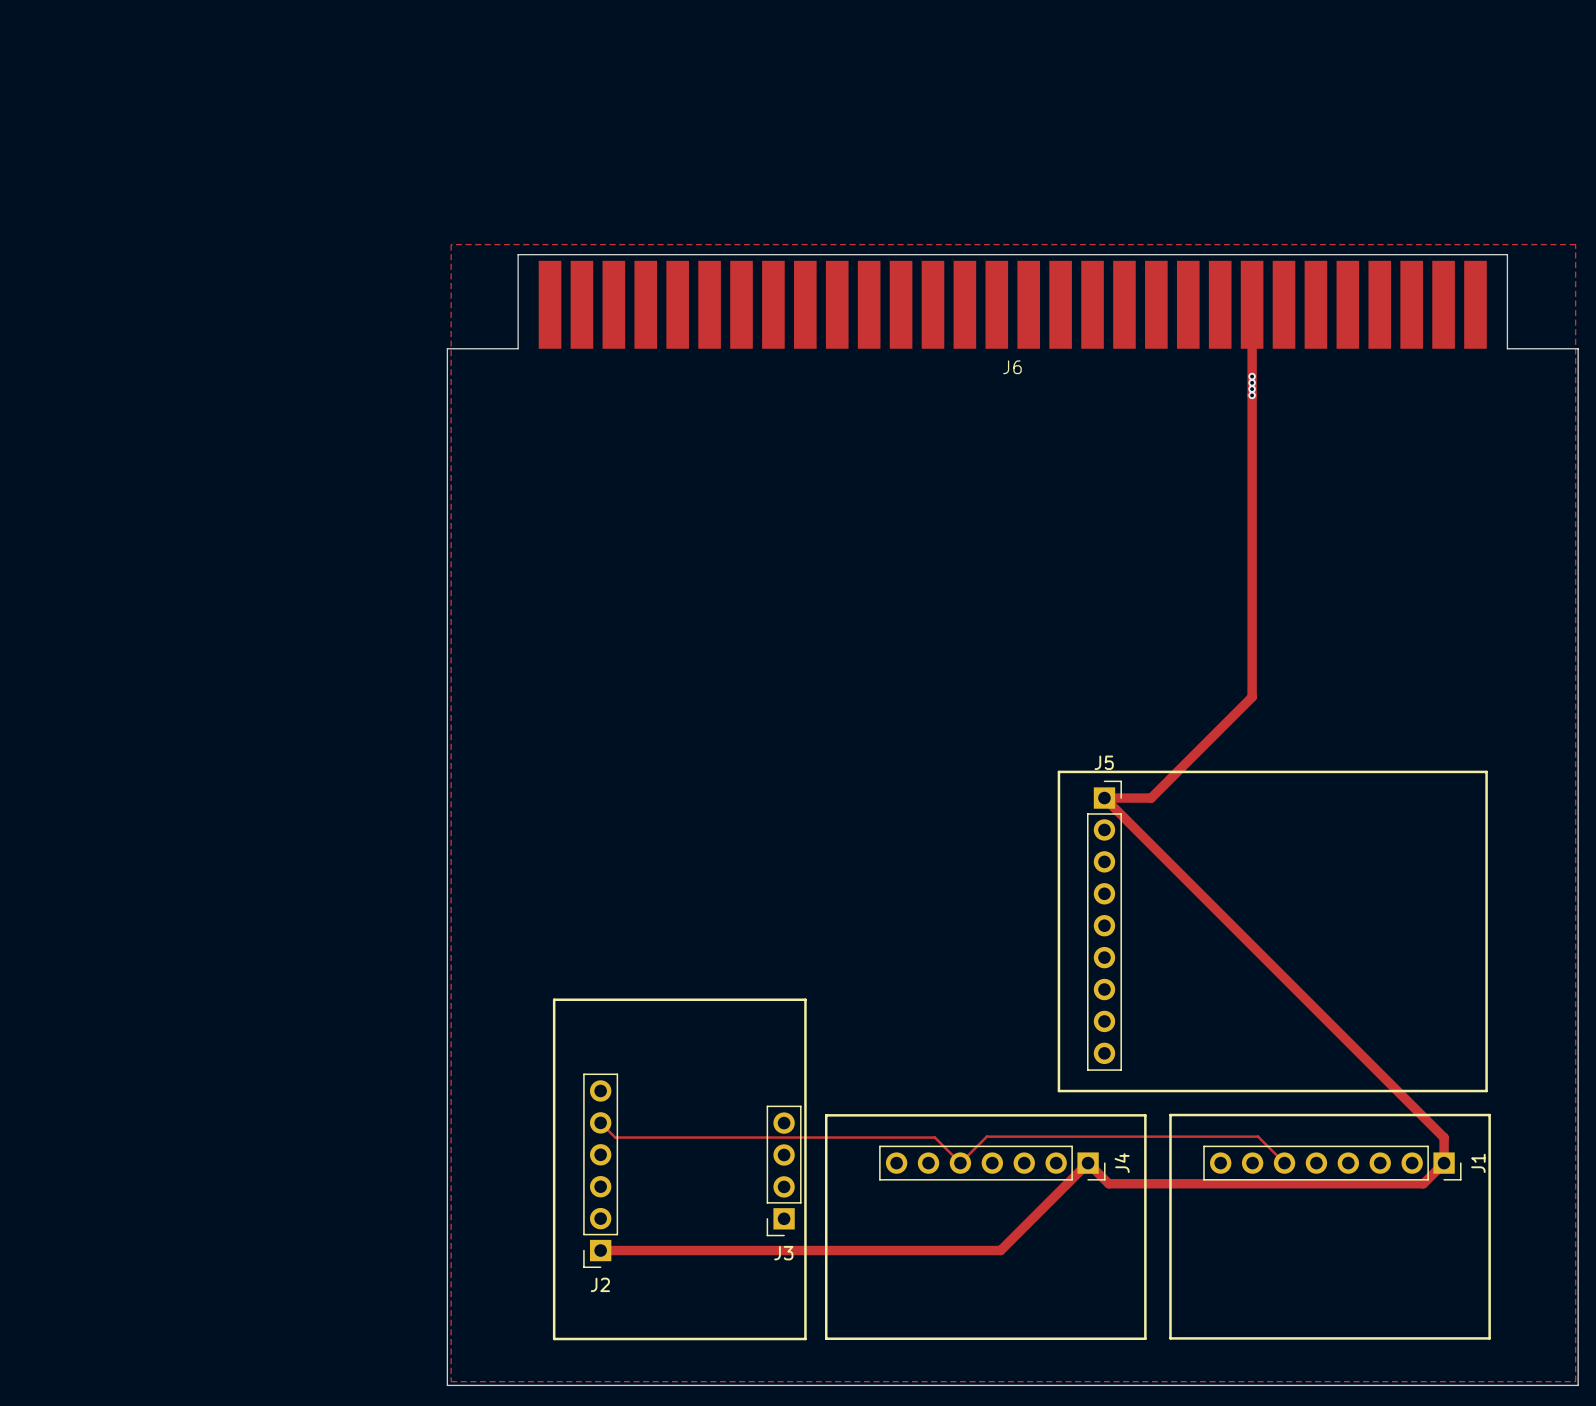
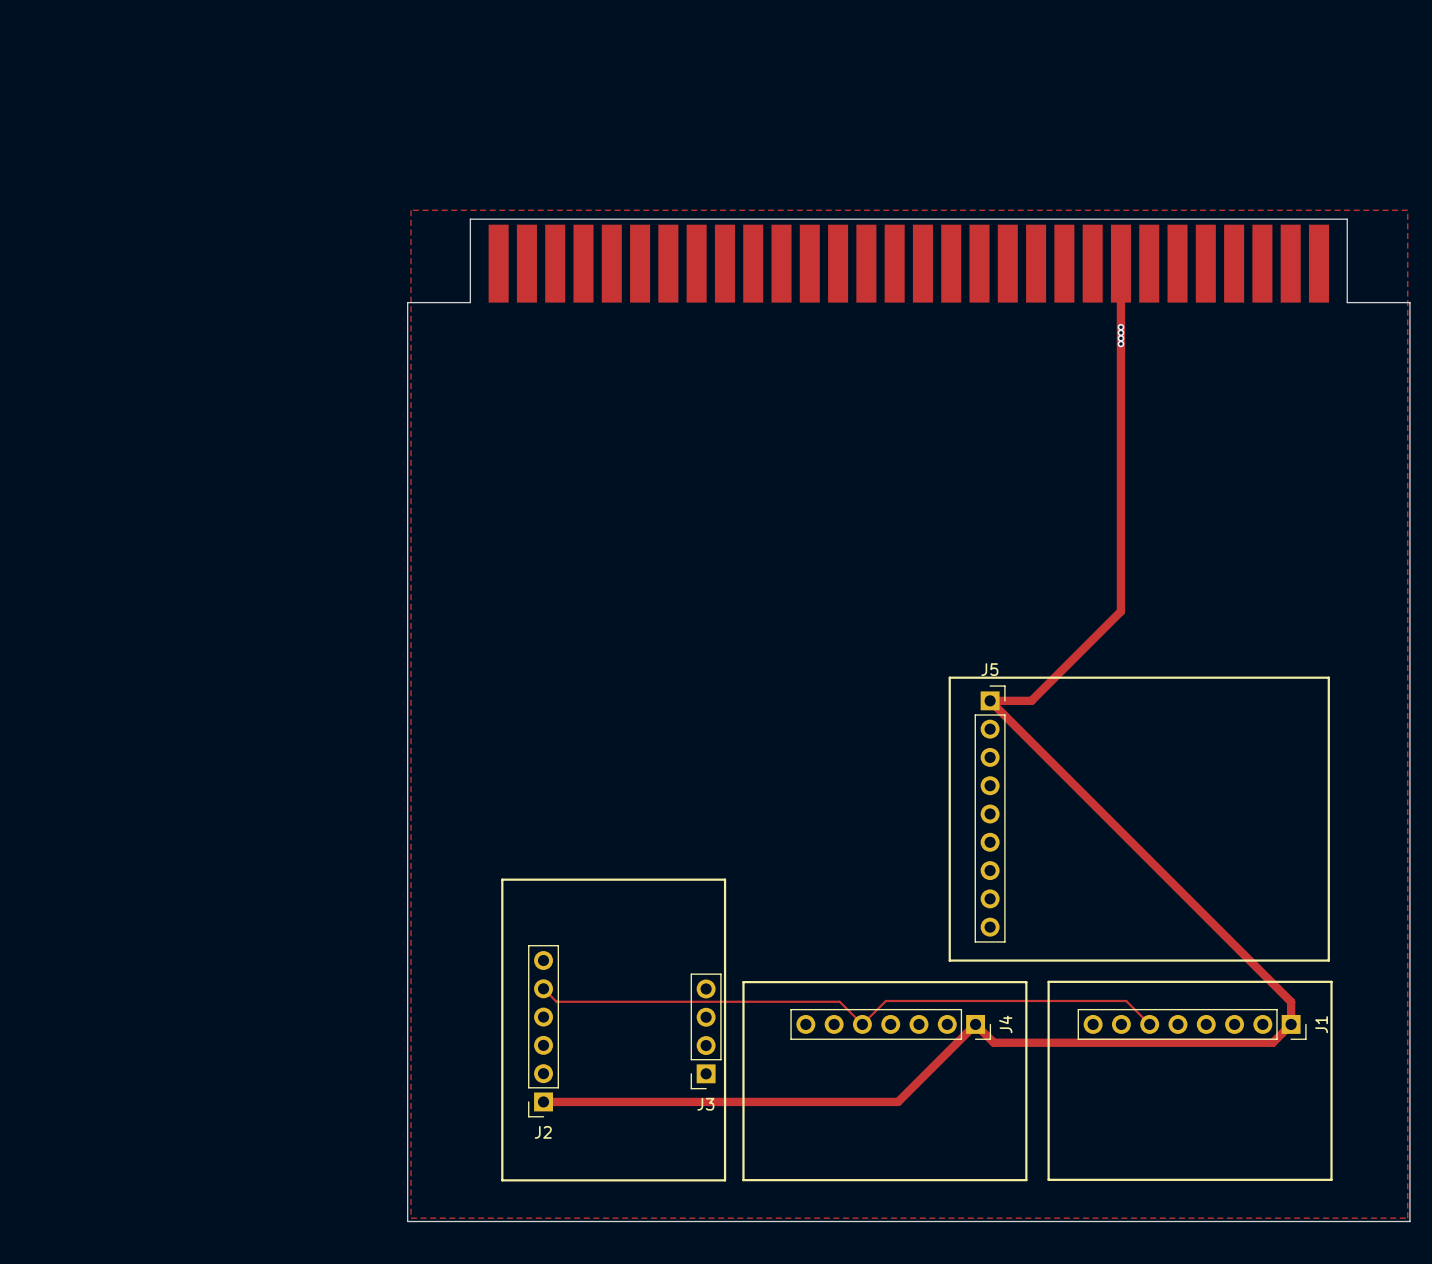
J6 name: J6 (1012, 367) -> none

